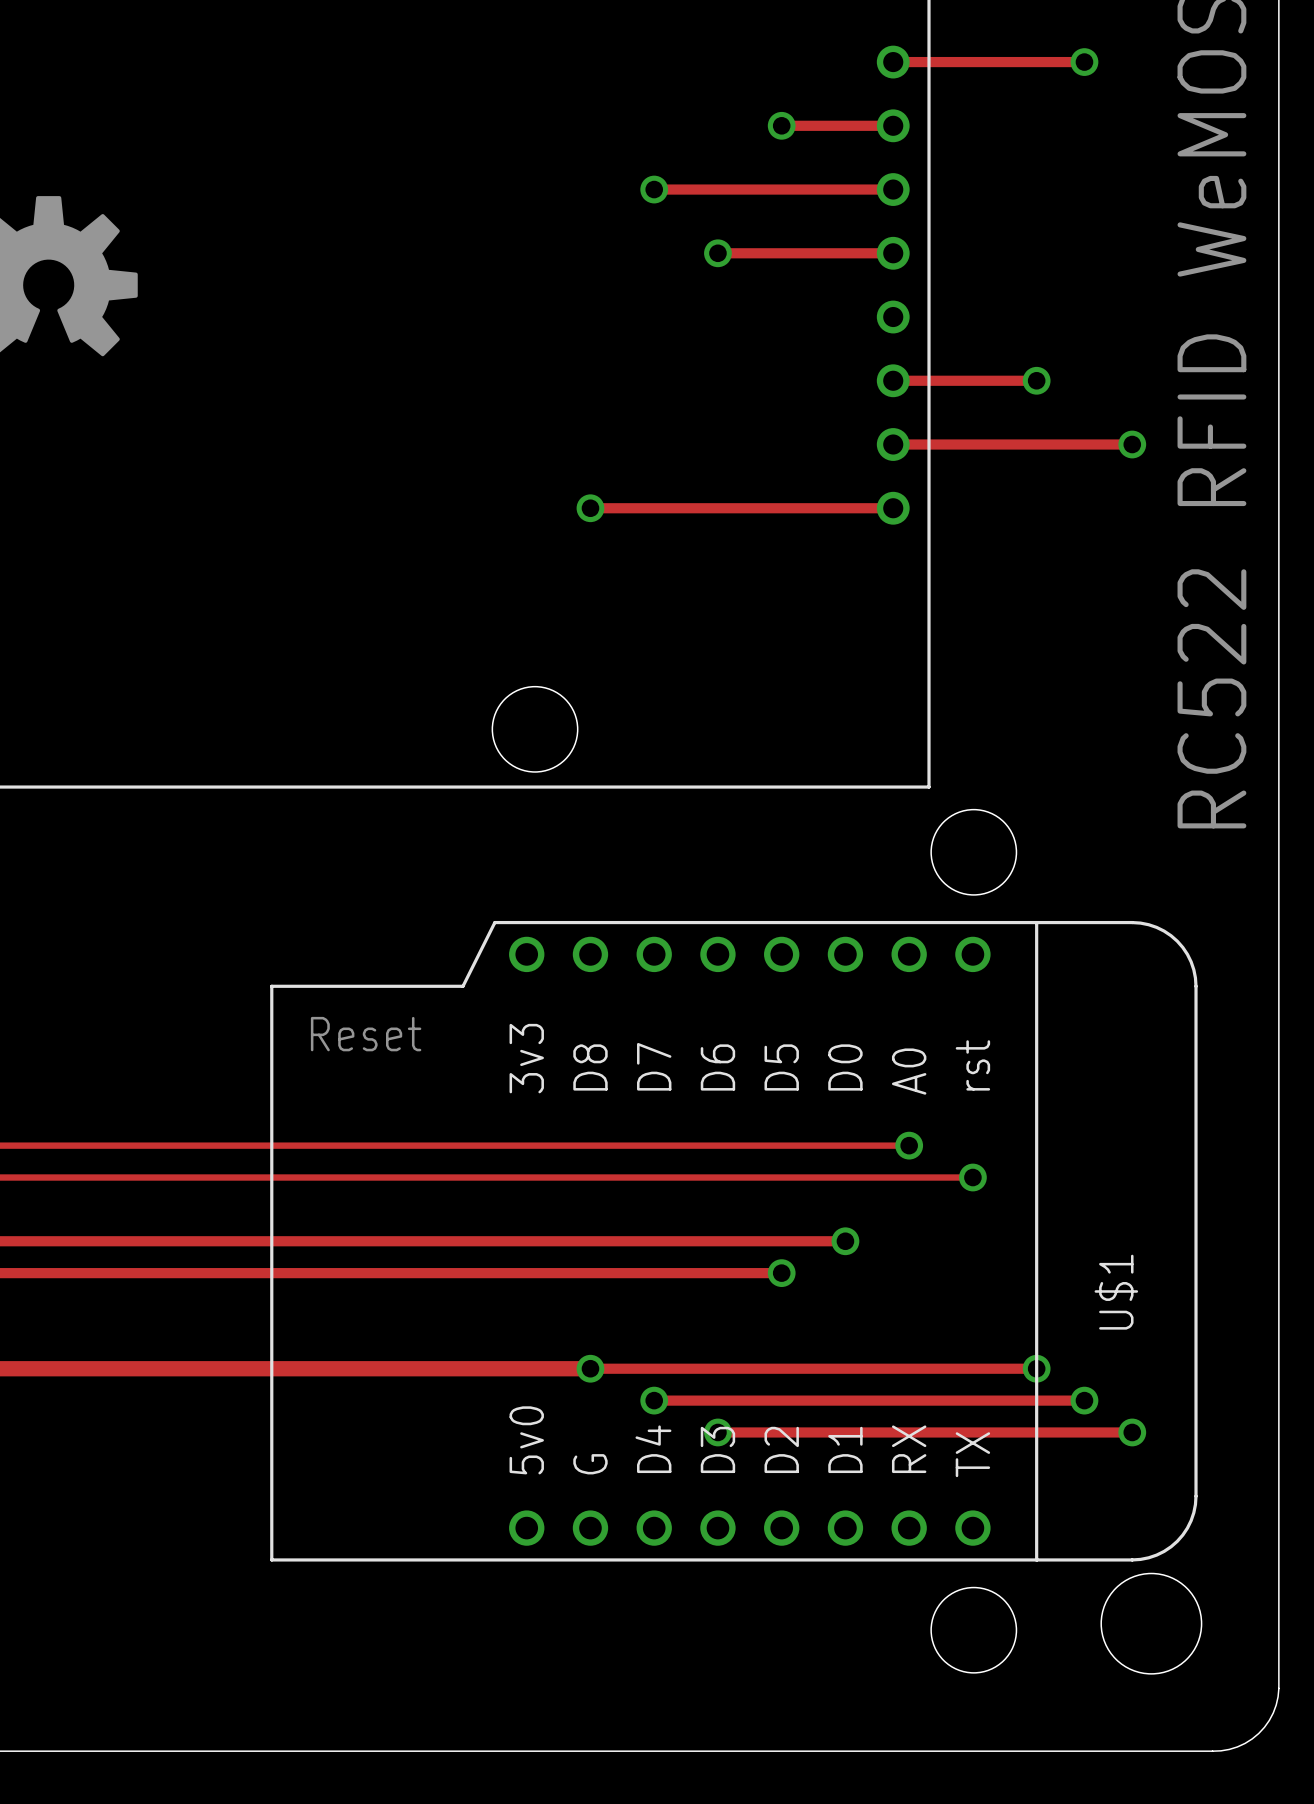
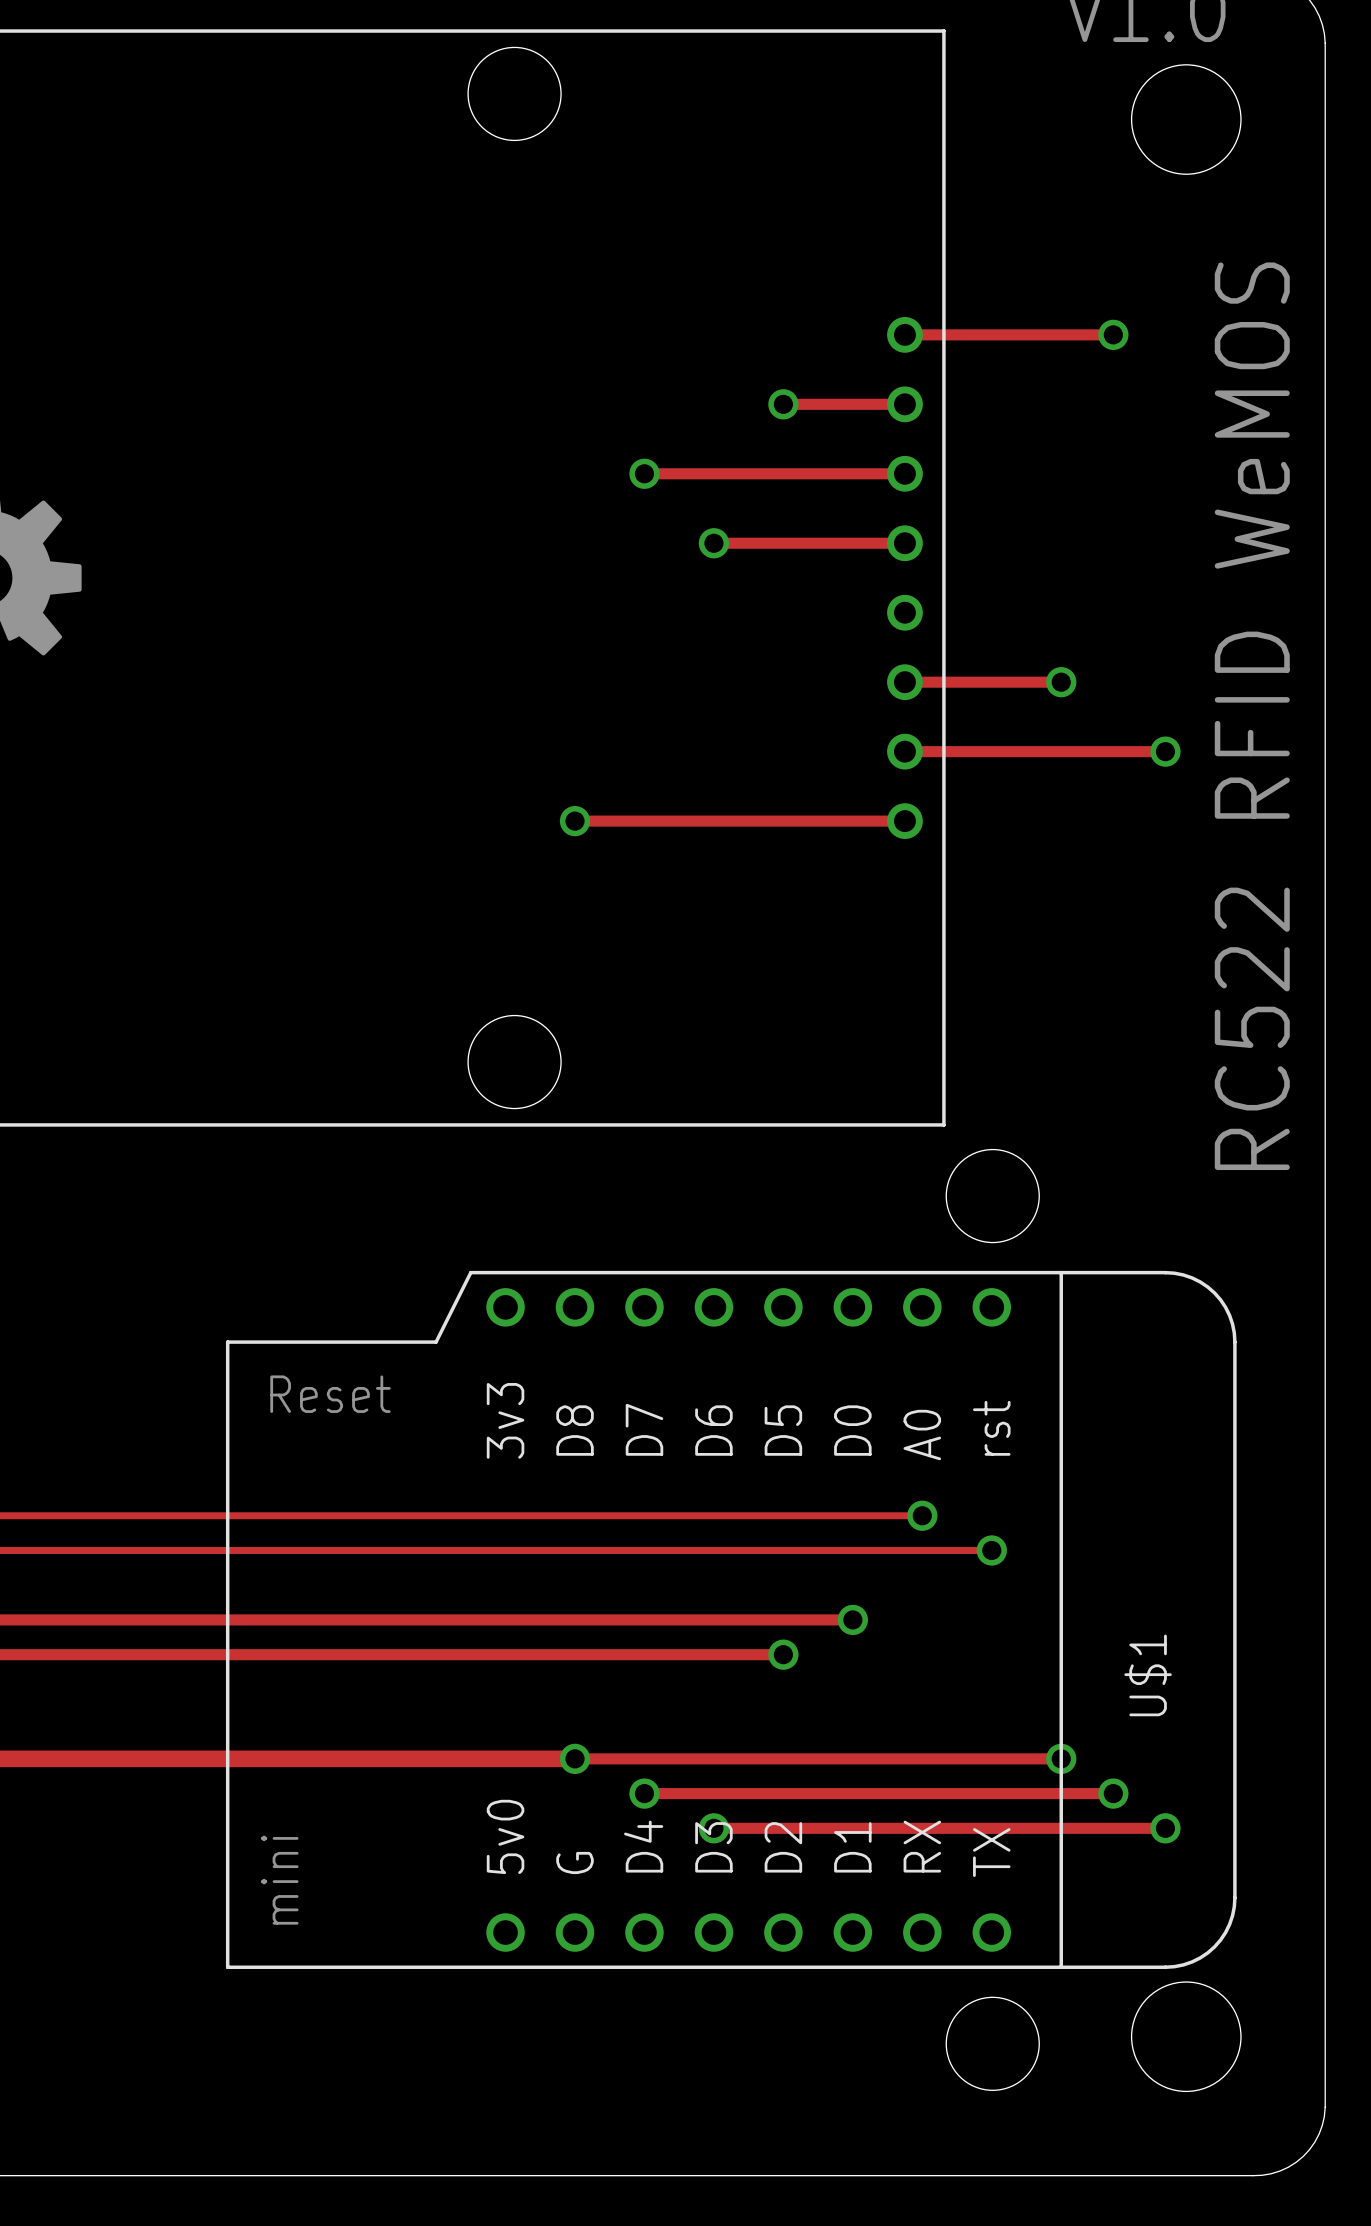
U$1 value: none -> mini (279, 1880)

